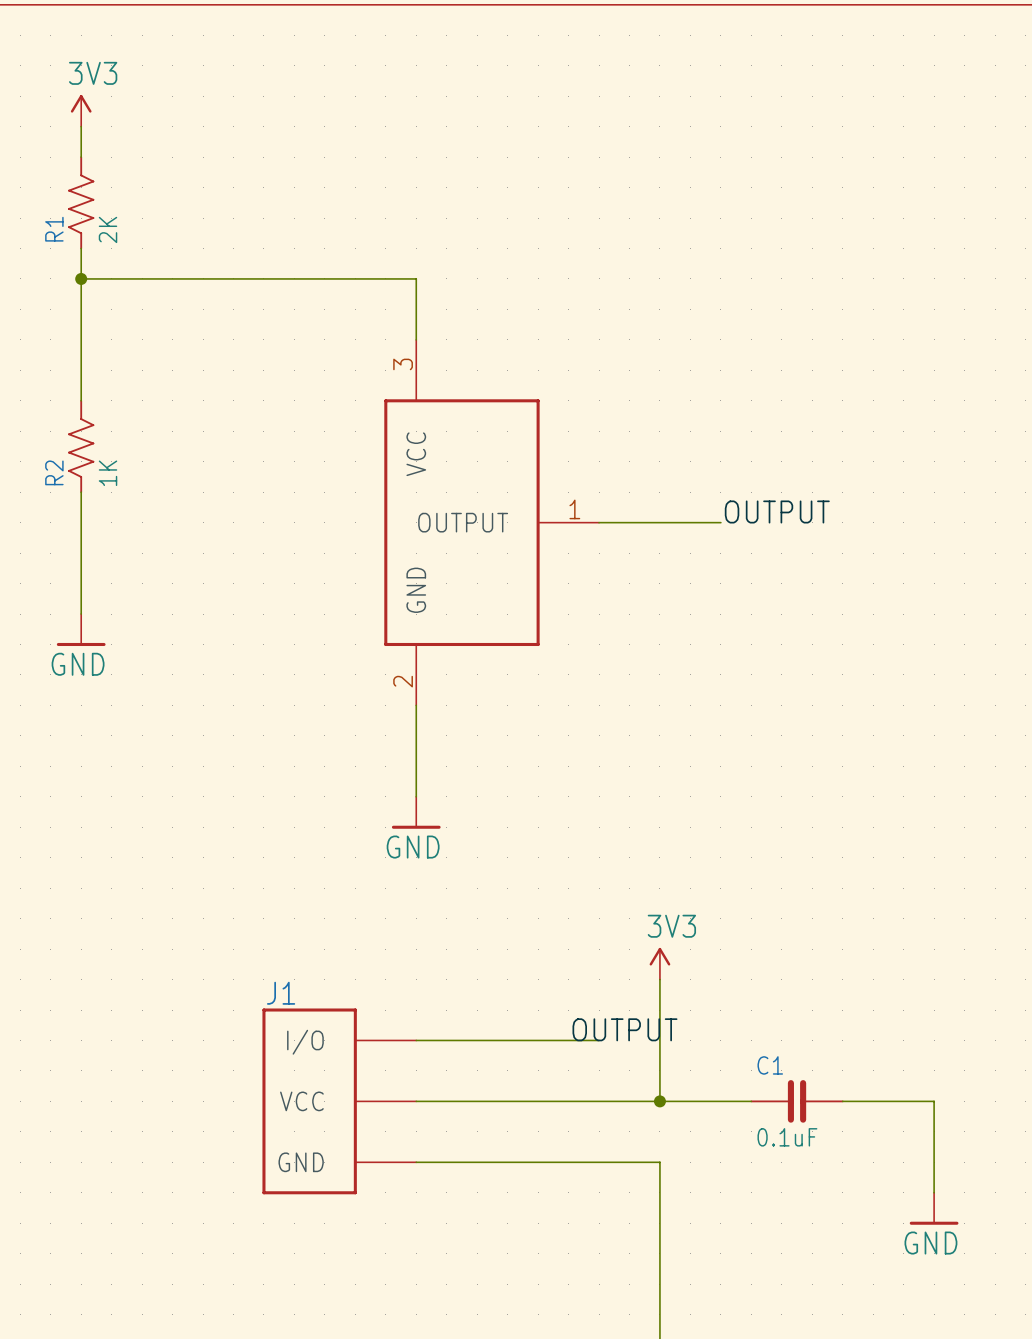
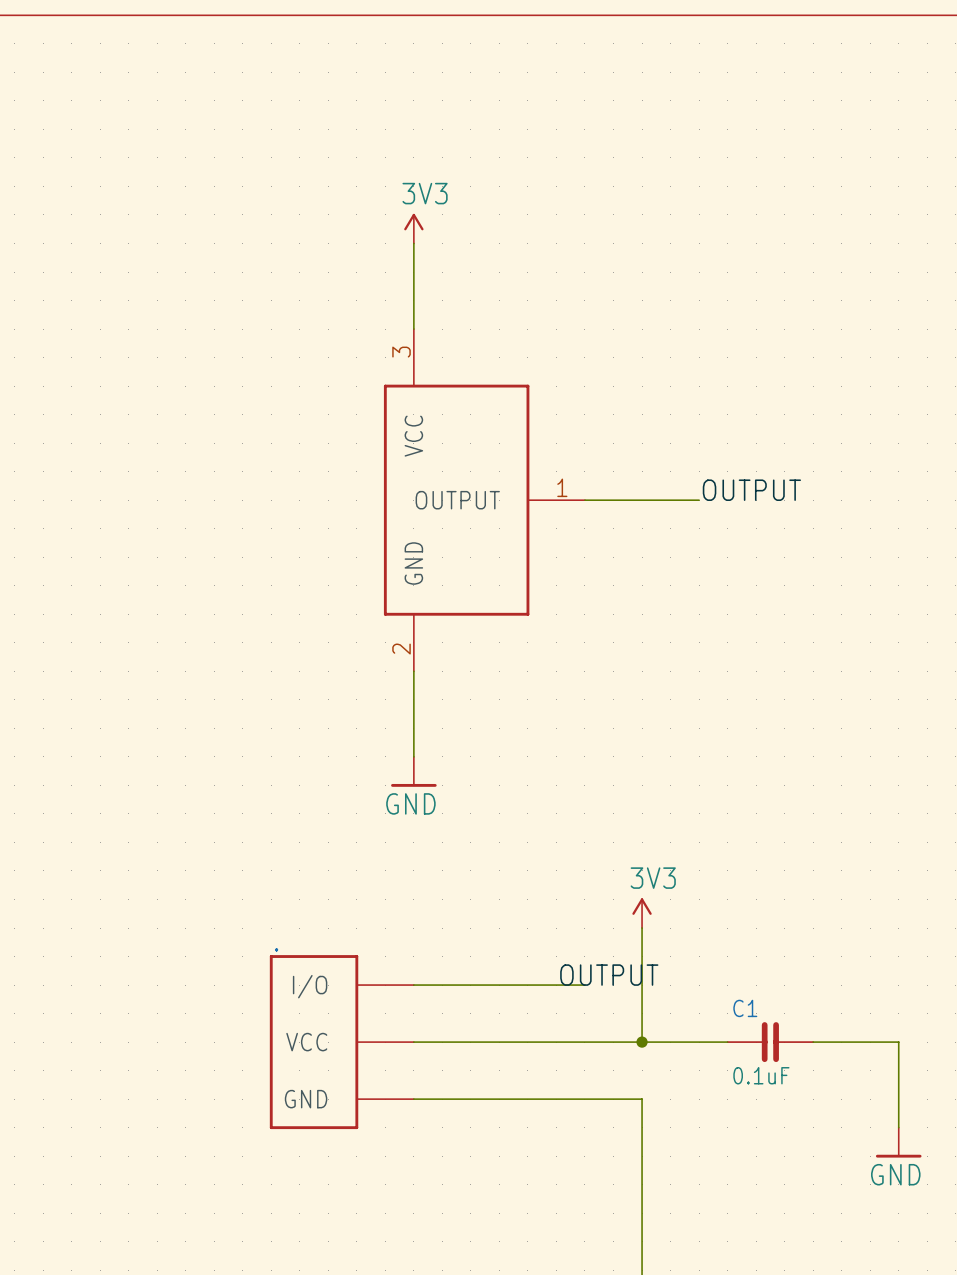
power symbol: 3V3 (81, 110) -> none
wire: (81, 126) (81, 157) -> none
R1: 2K (81, 202) -> none
power symbol: none -> 3V3 (413, 228)
wire: (81, 248) (81, 400) -> none
wire: (81, 278) (416, 278) -> (413, 243) (413, 272)
junction: (81, 278) -> none
R2: 1K (81, 446) -> none
wire: (81, 492) (81, 614) -> none
power symbol: GND (81, 630) -> none
J1 name: J1 (281, 993) -> . (276, 949)

